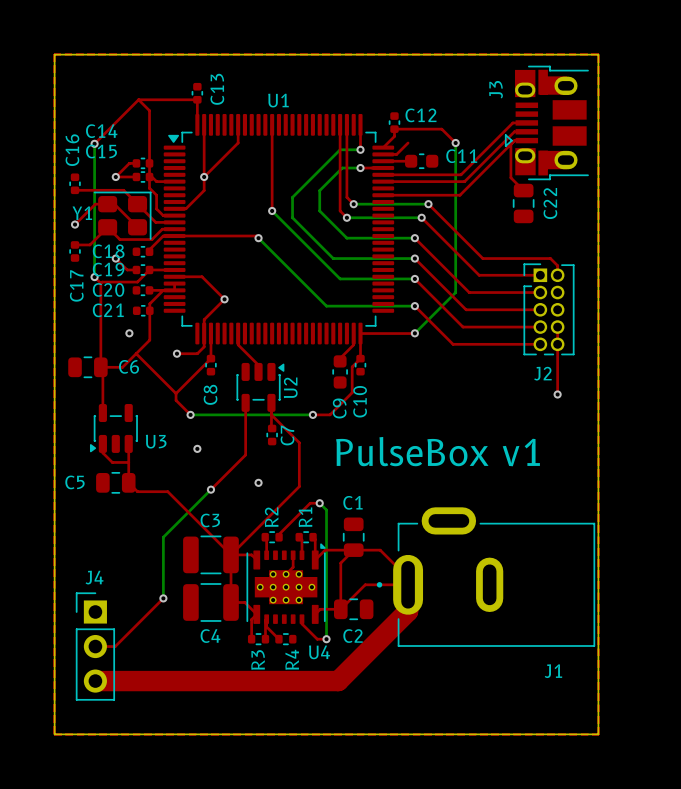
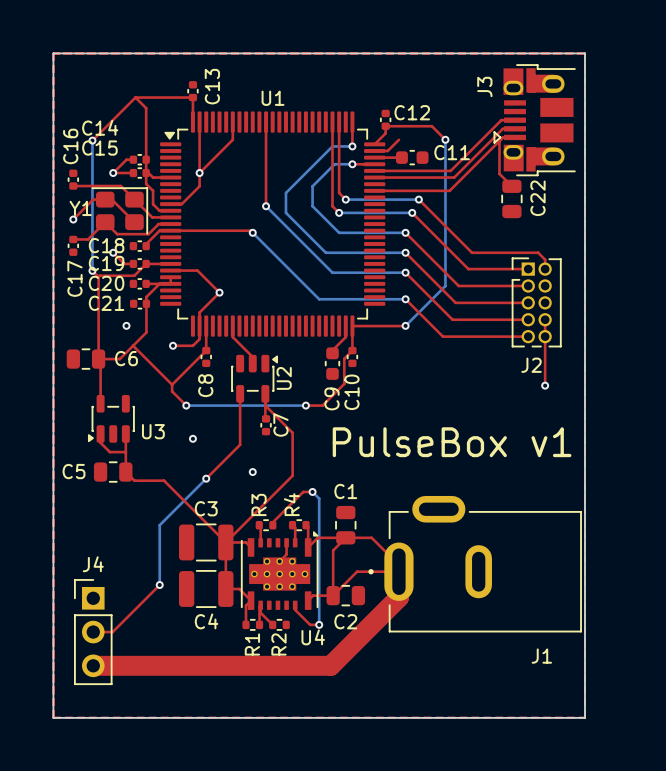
R2 name: R2 (271, 517) -> R3 (259, 504)
R1 name: R1 (305, 517) -> R4 (291, 504)
R3 name: R3 (258, 659) -> R1 (252, 644)
R4 name: R4 (292, 659) -> R2 (278, 644)

